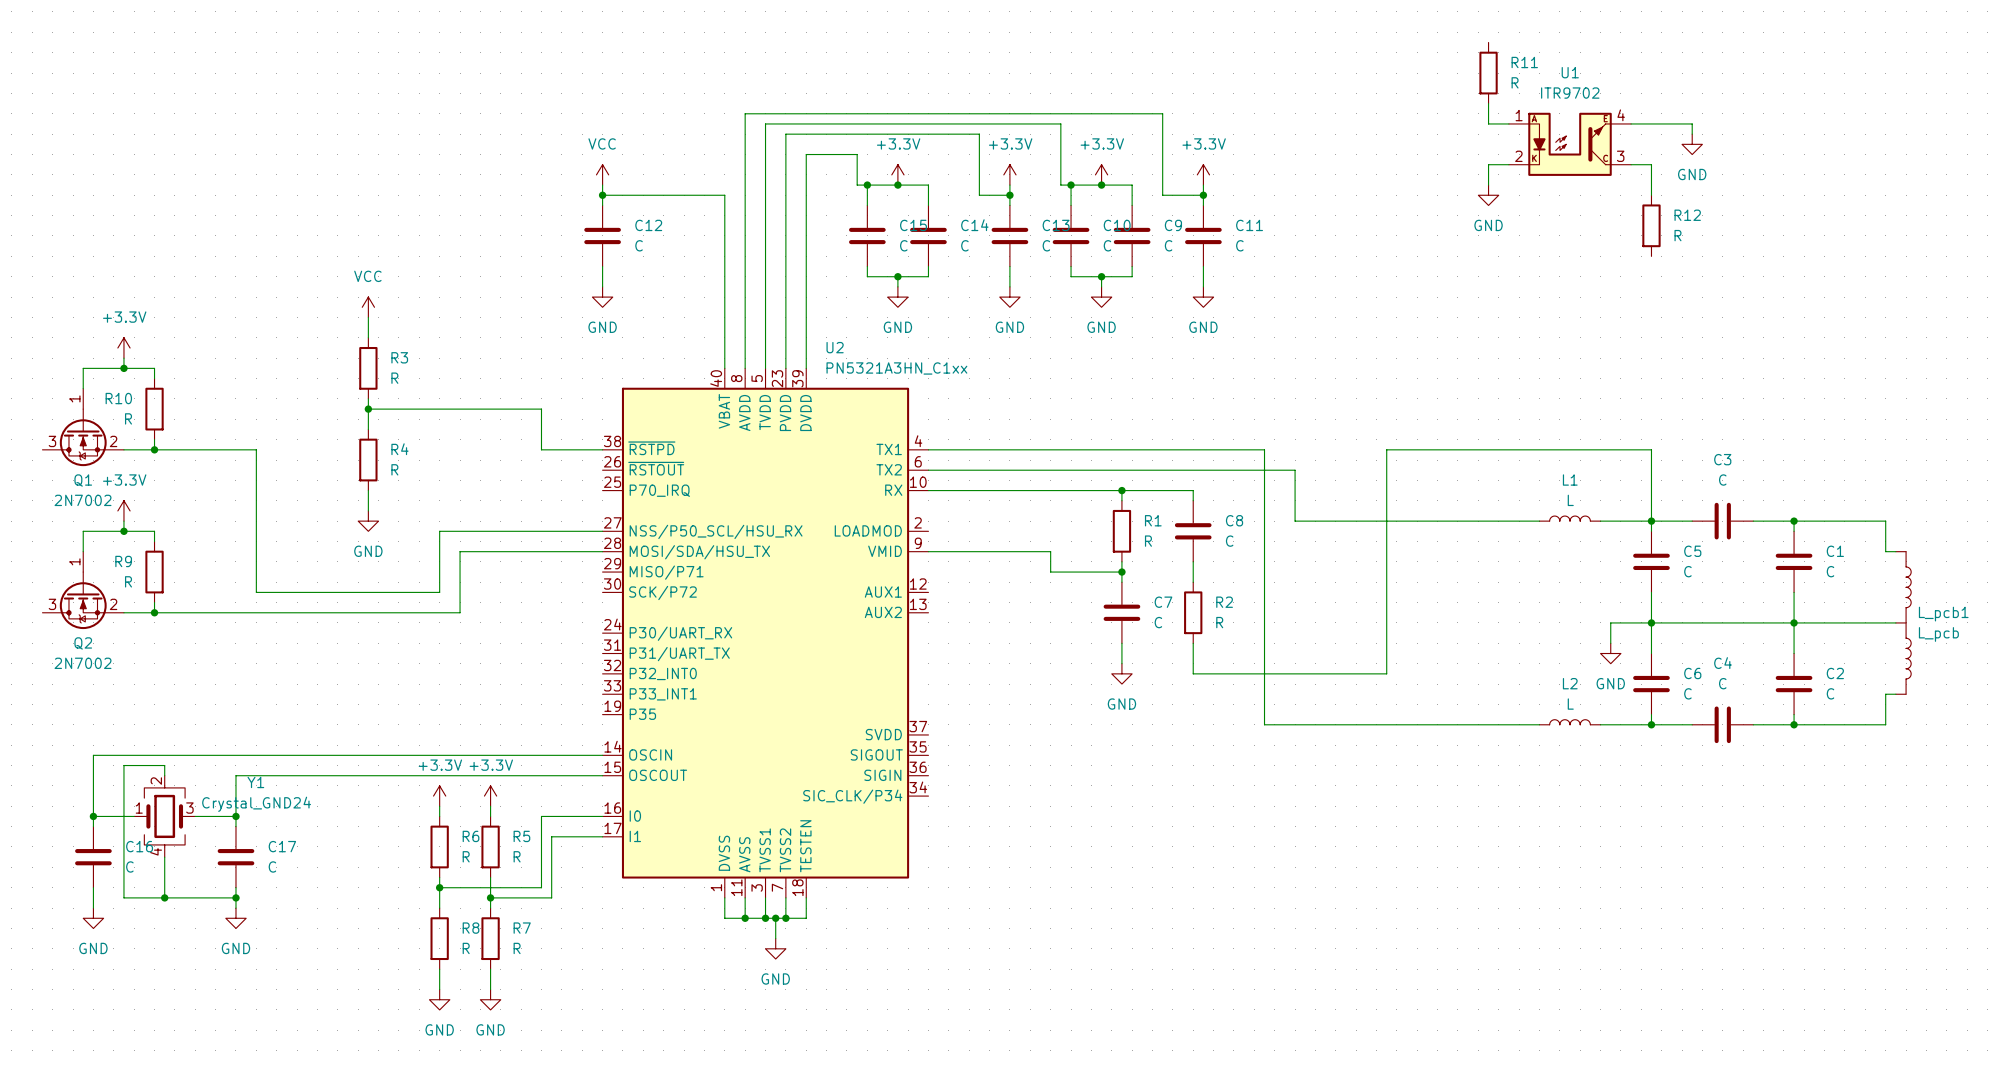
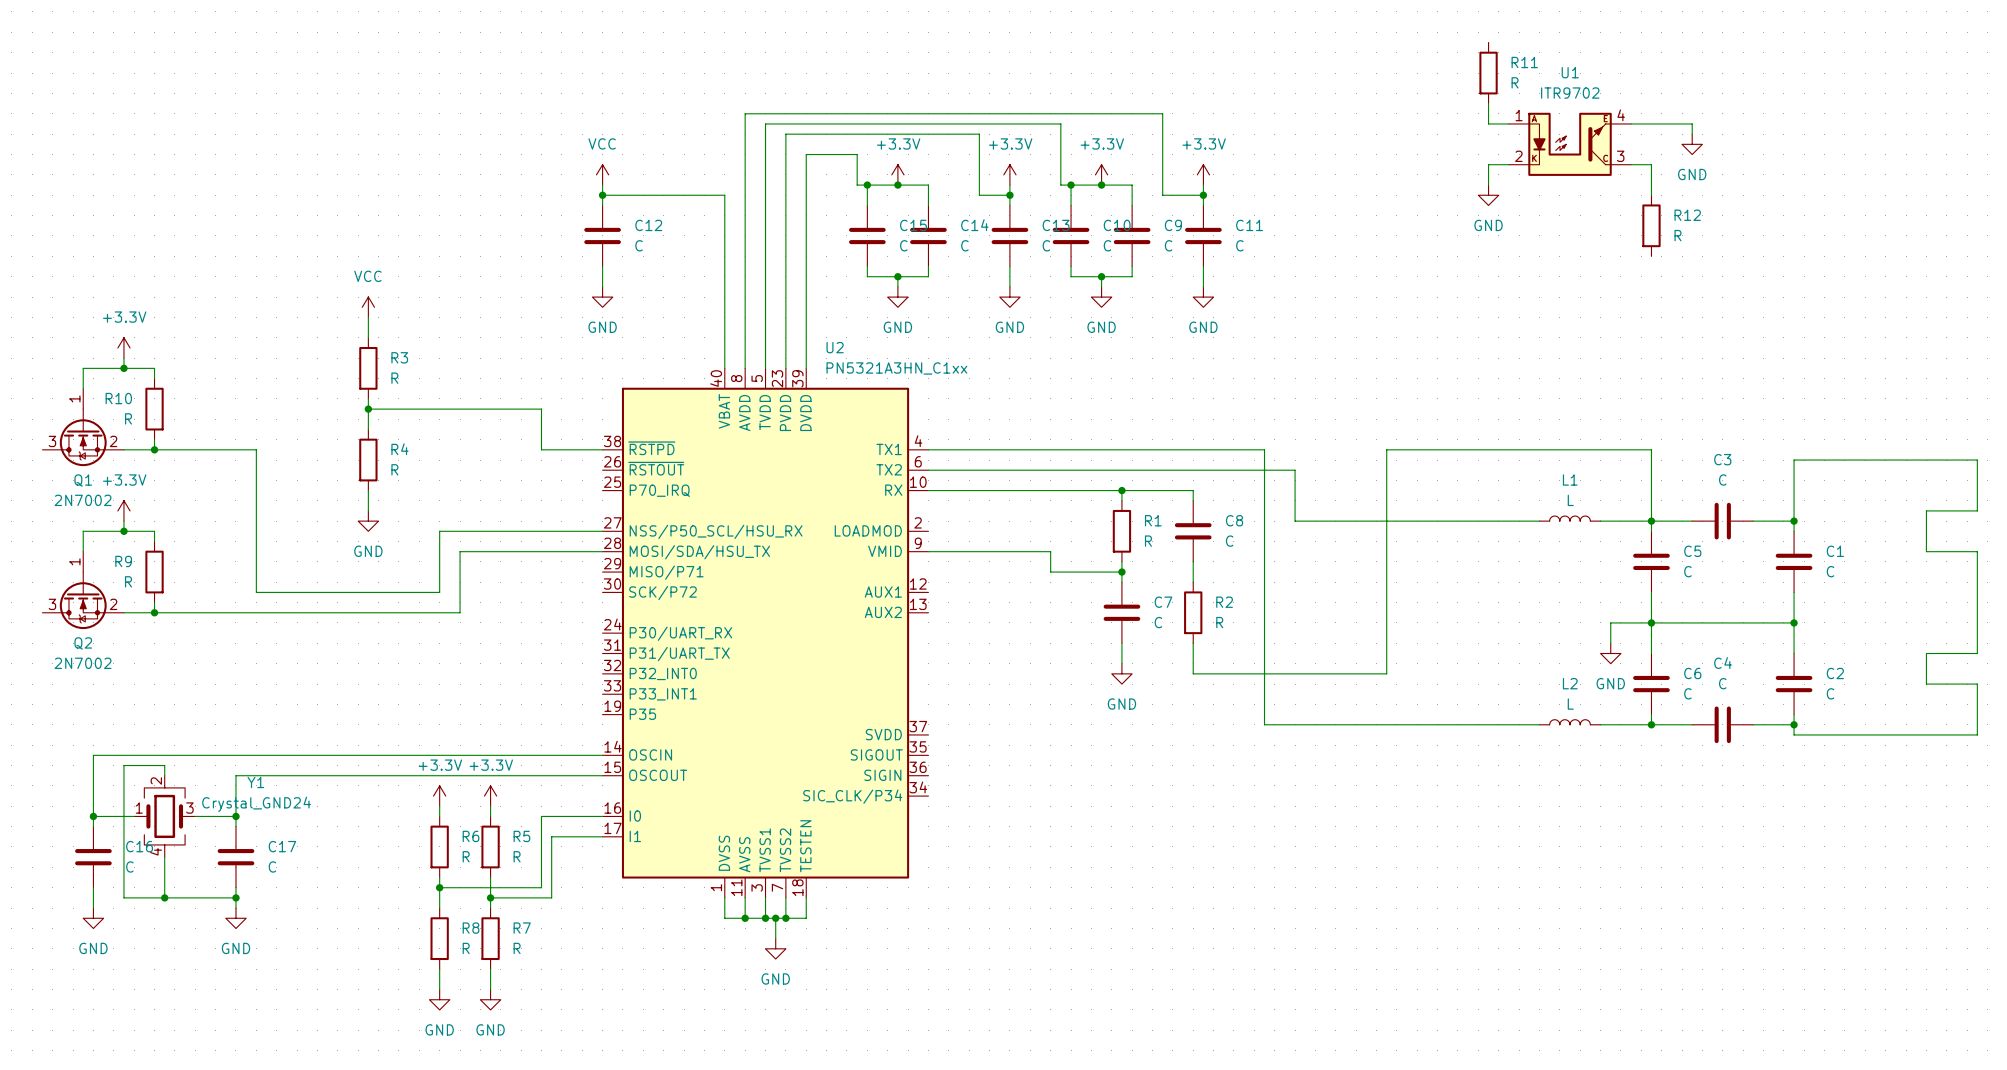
wire: (1794, 521) (1885, 521) (1885, 551) (1895, 551) -> none
wire: (1794, 622) (1895, 622) -> none
L_pcb1: L_pcb (1903, 622) -> none
wire: (1895, 694) (1885, 694) (1885, 724) (1794, 724) -> (1794, 521) (1794, 460) (1977, 460) (1977, 510) (1926, 510) (1926, 551) (1977, 551) (1977, 653) (1926, 653) (1926, 684) (1977, 684) (1977, 734) (1794, 734) (1794, 724)

